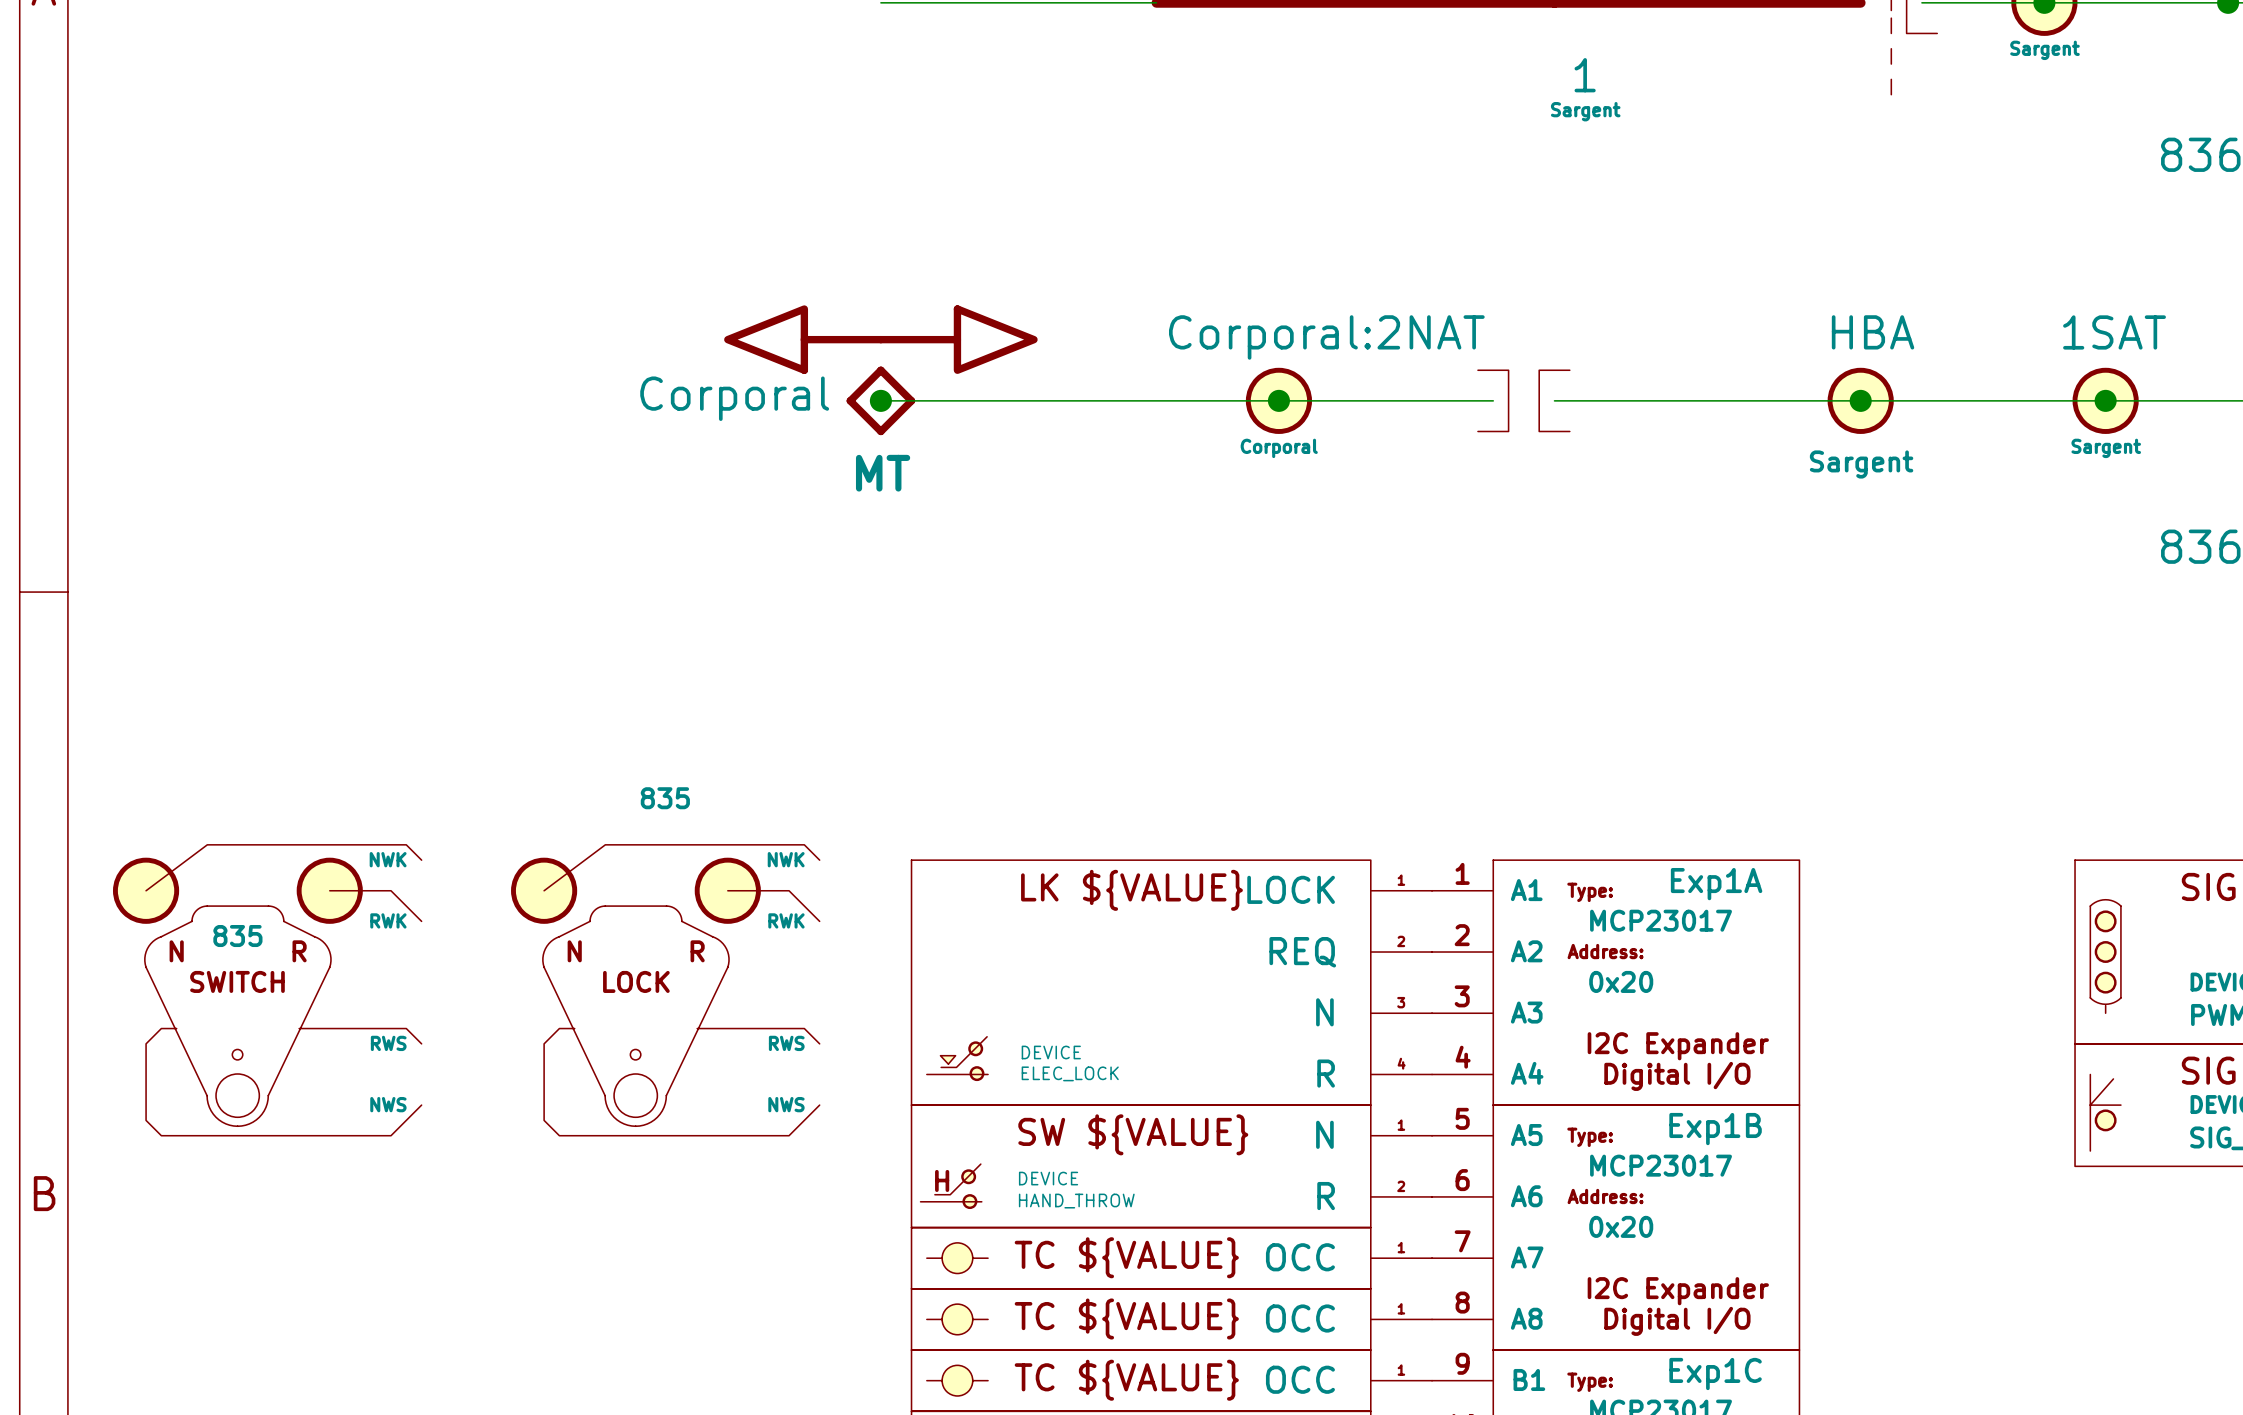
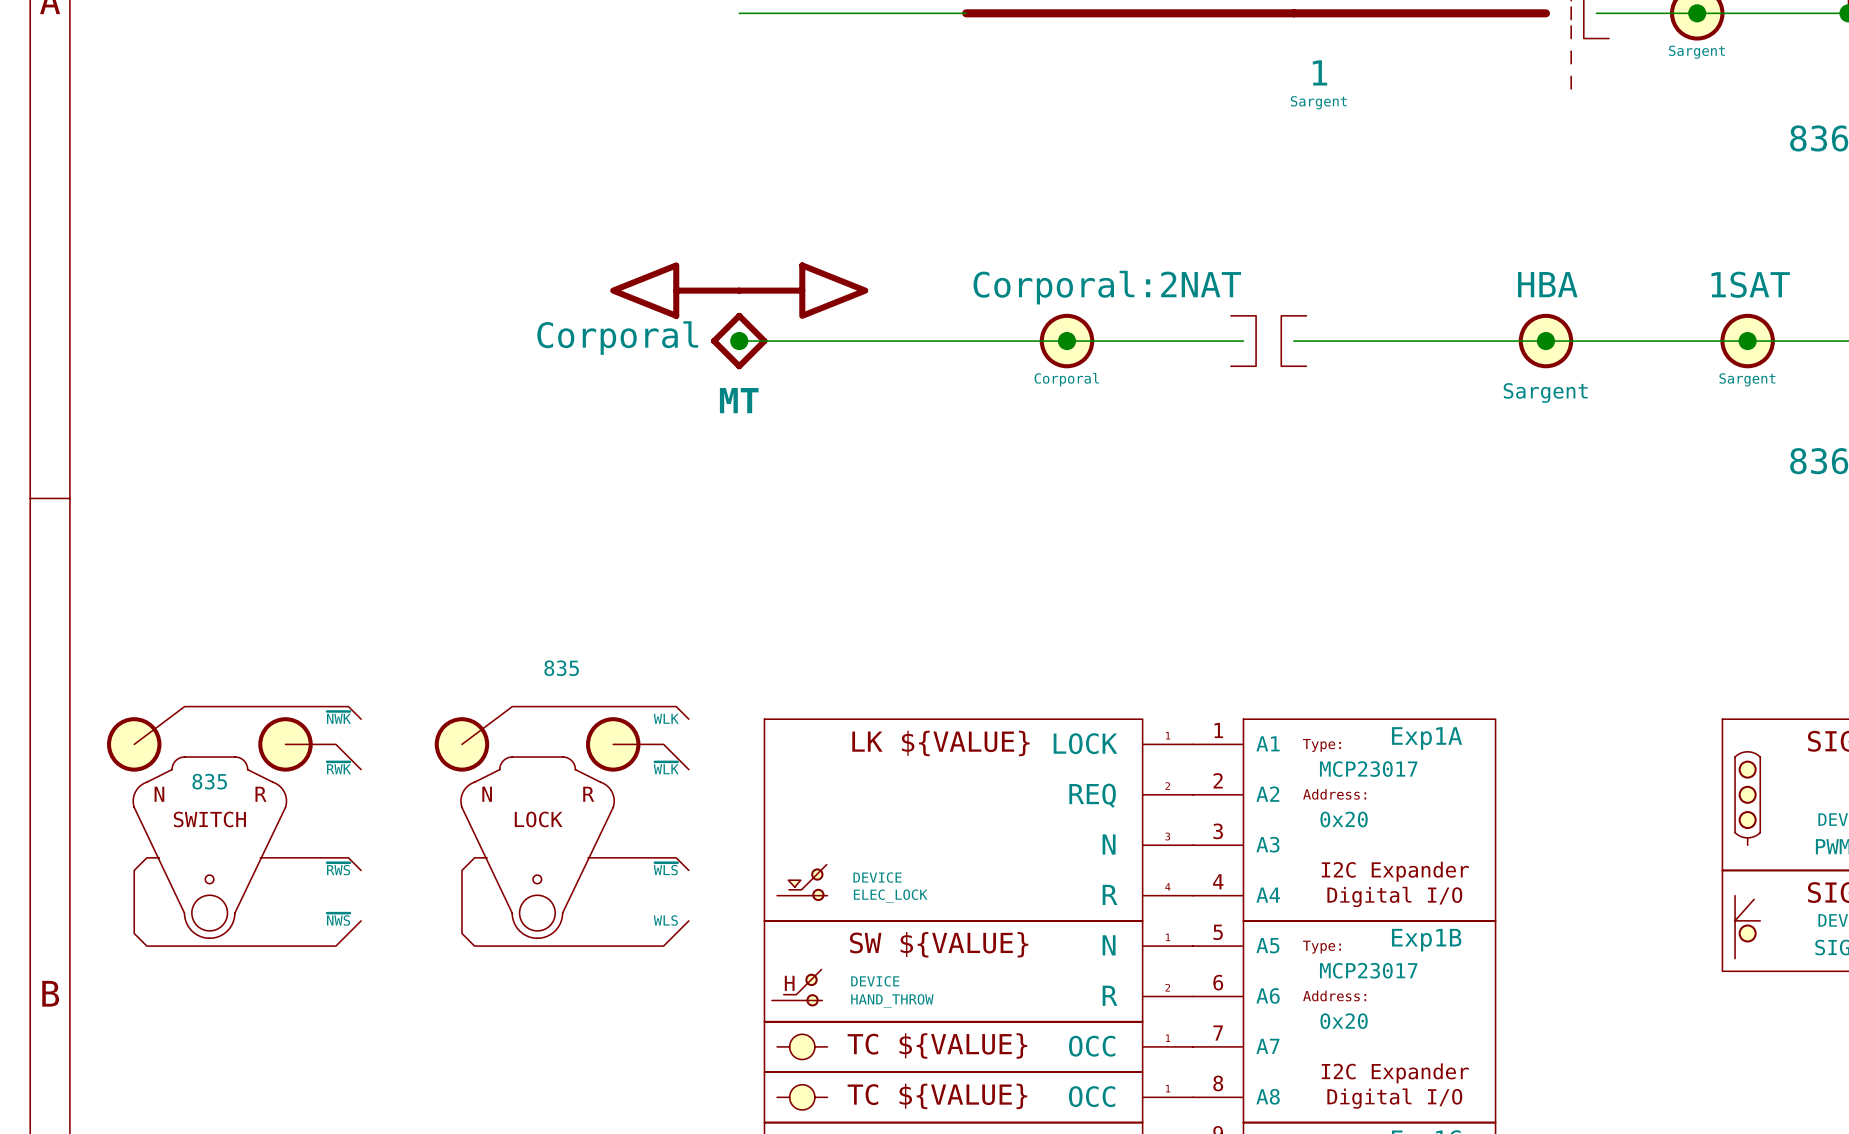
part pin name: NWK (388, 859) -> ~{NWK} (338, 717)
part pin name: NWK (786, 859) -> WLK (666, 718)
part pin name: RWK (388, 920) -> ~{RWK} (339, 768)
part pin name: RWK (786, 920) -> ~{WLK} (666, 768)
part pin name: RWS (388, 1043) -> ~{RWS} (338, 869)
part pin name: RWS (786, 1043) -> ~{WLS} (665, 869)
part pin name: NWS (388, 1104) -> ~{NWS} (338, 919)
part pin name: NWS (786, 1104) -> WLS (665, 920)

